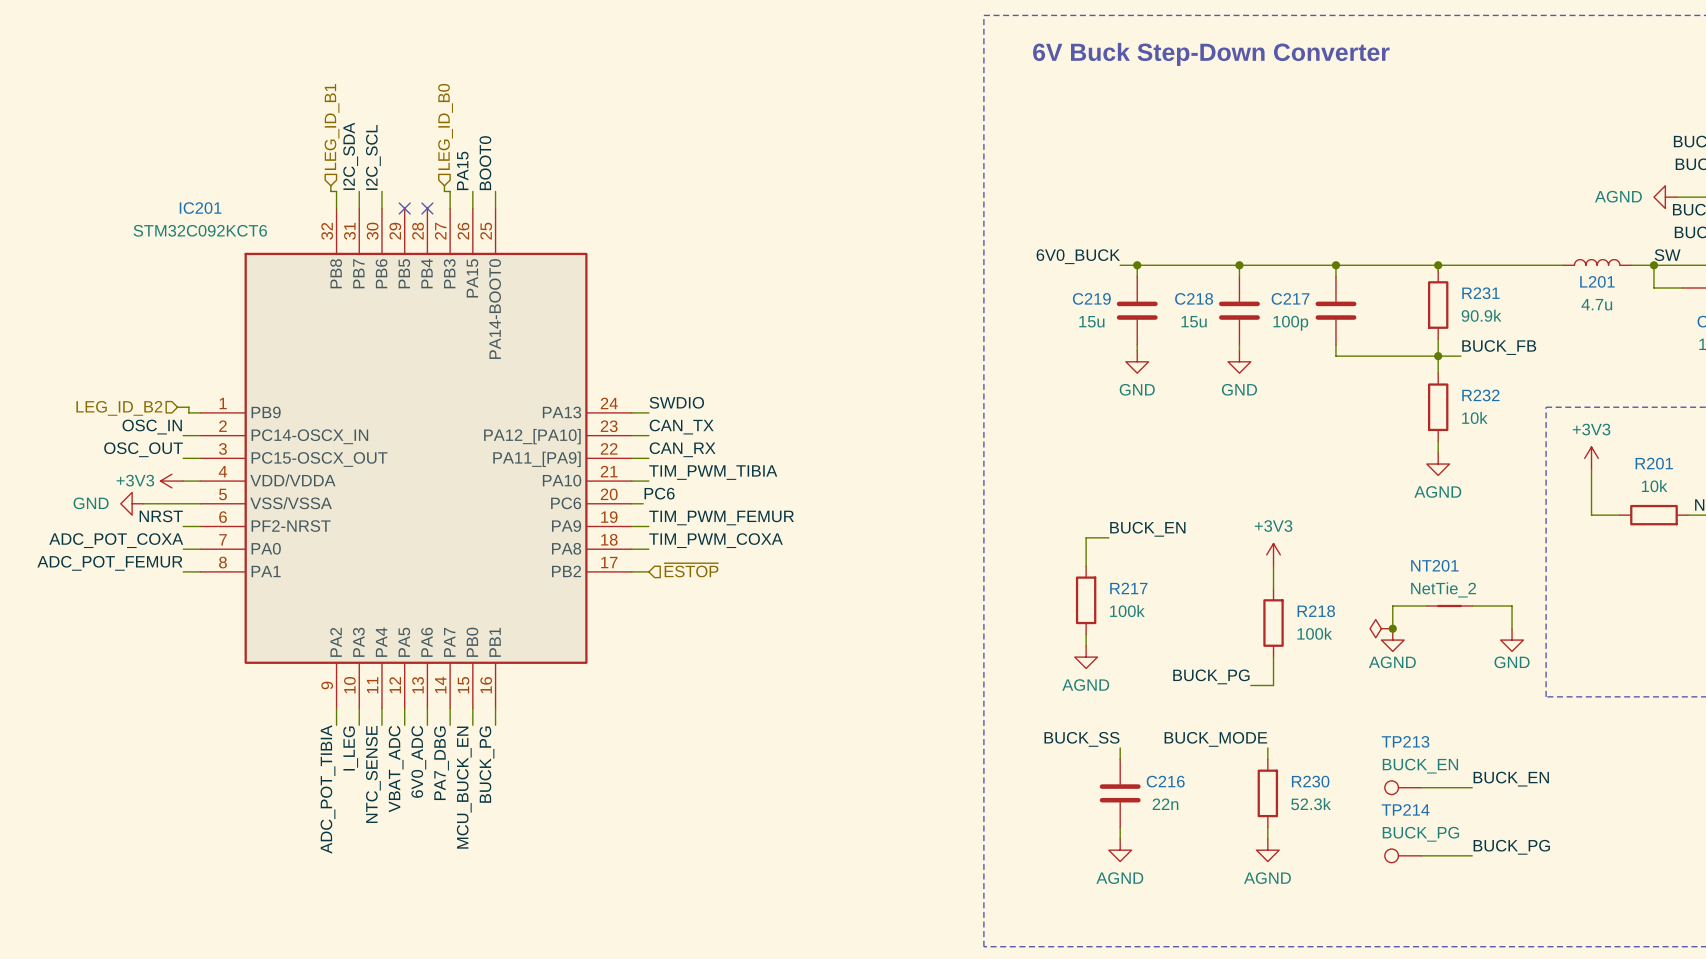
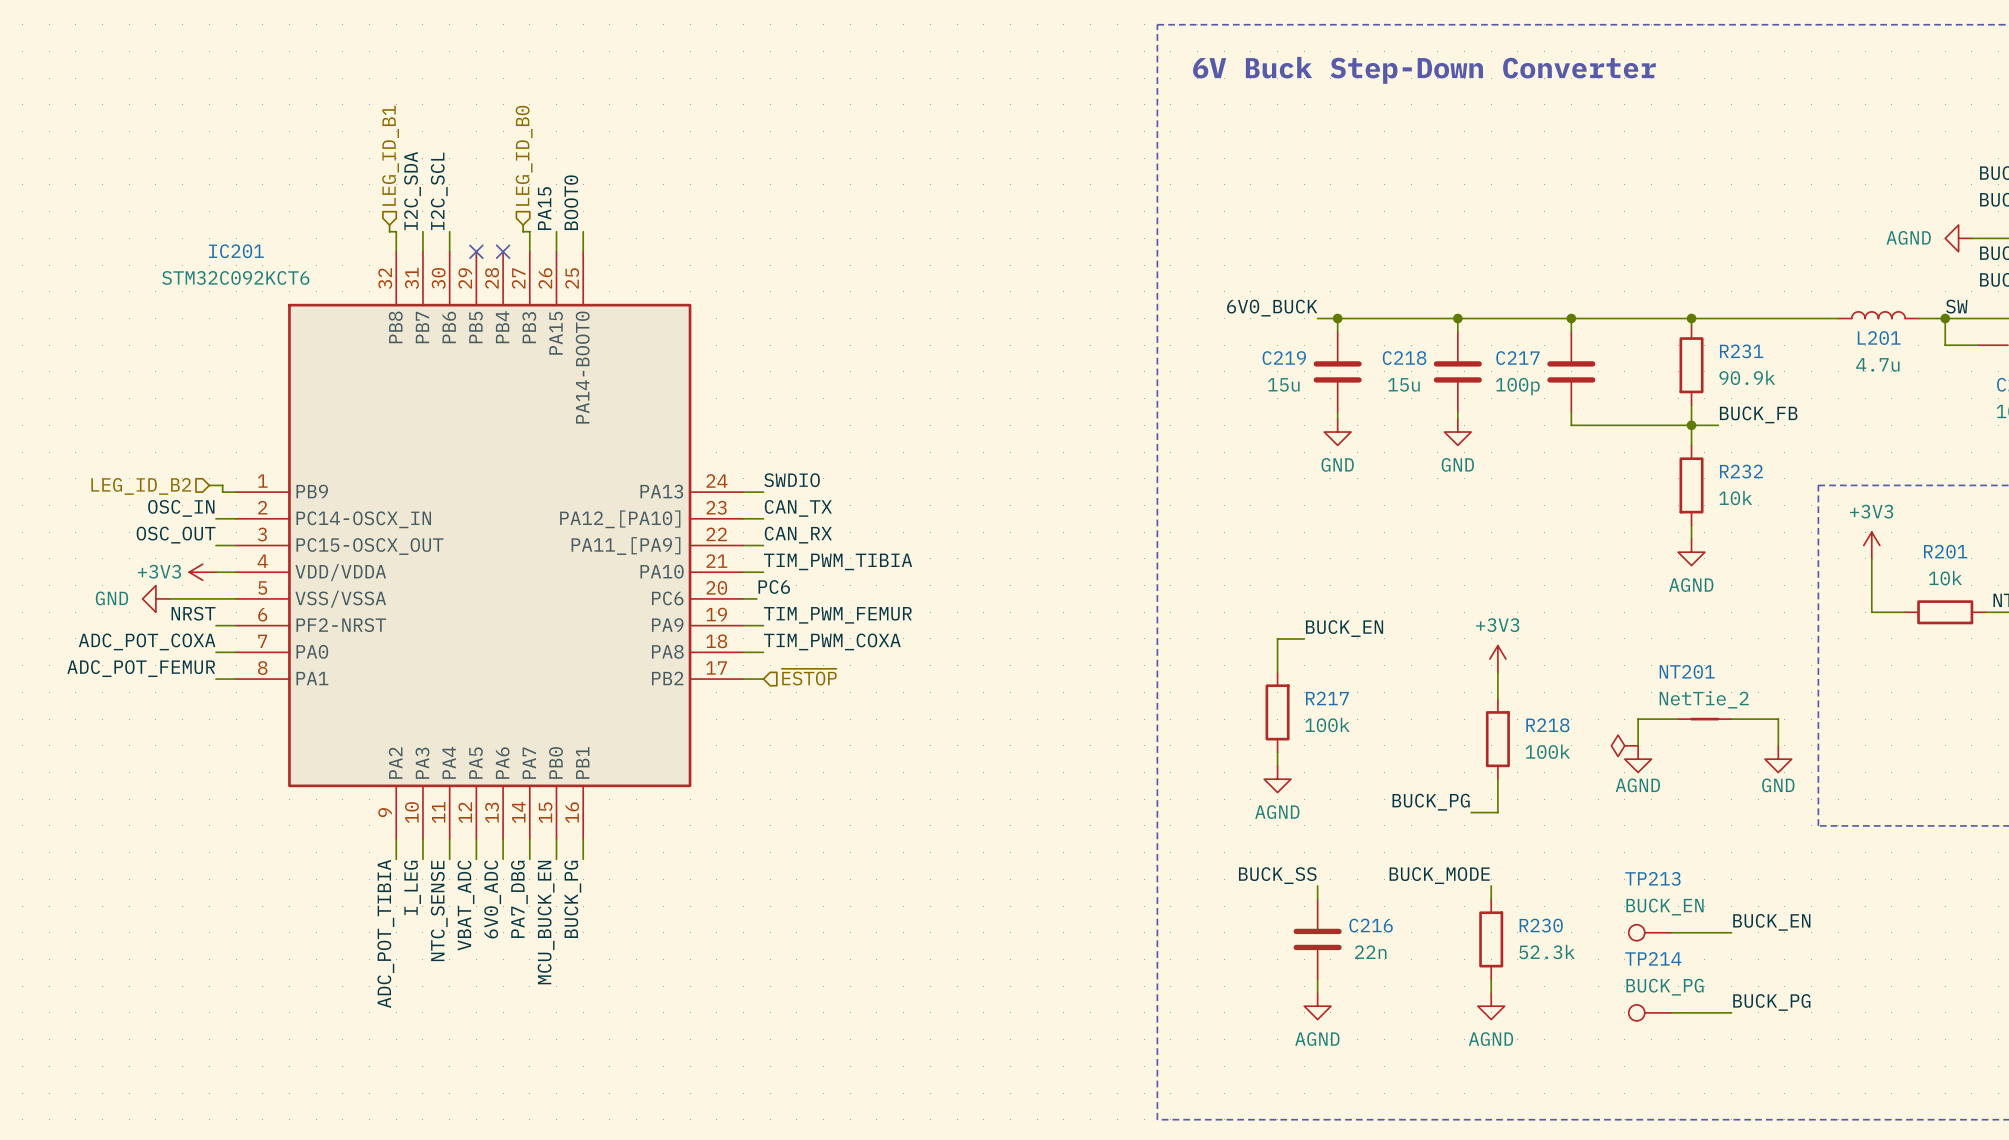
junction: (1392, 628) -> none

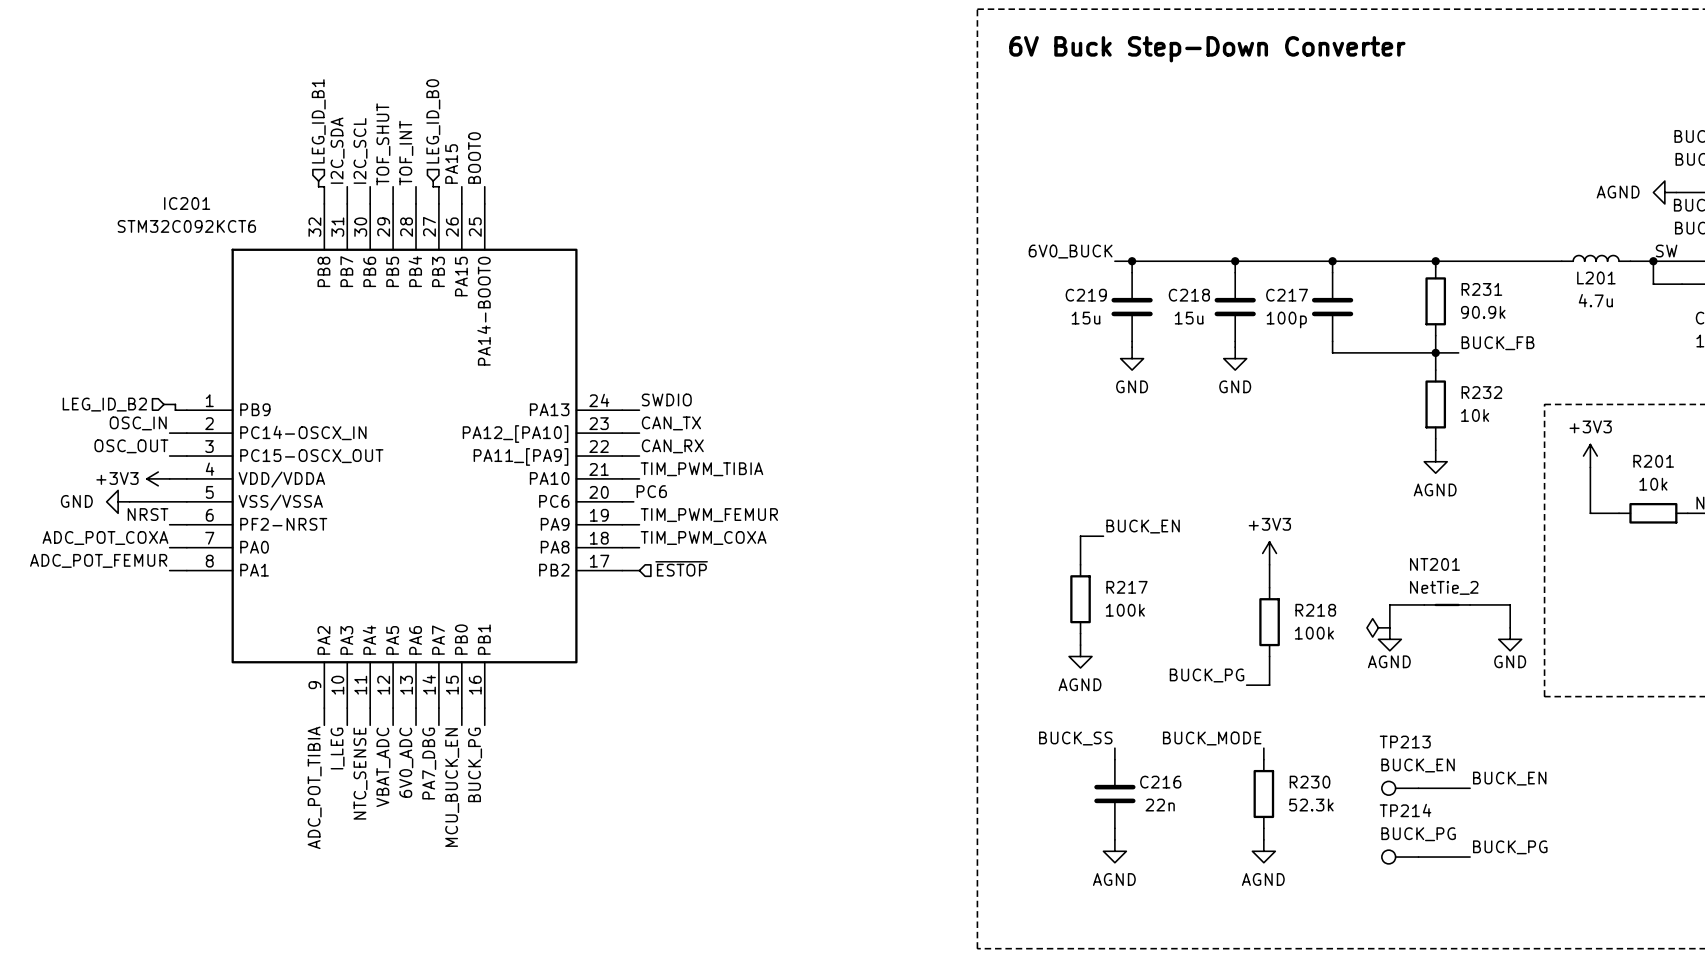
label: none -> TOF_SHUT (383, 144)
label: none -> TOF_INT (406, 153)
wire: none -> (393, 186) (393, 203)
wire: none -> (416, 186) (416, 203)
no-connect mark: (476, 251) -> none
no-connect mark: (503, 251) -> none

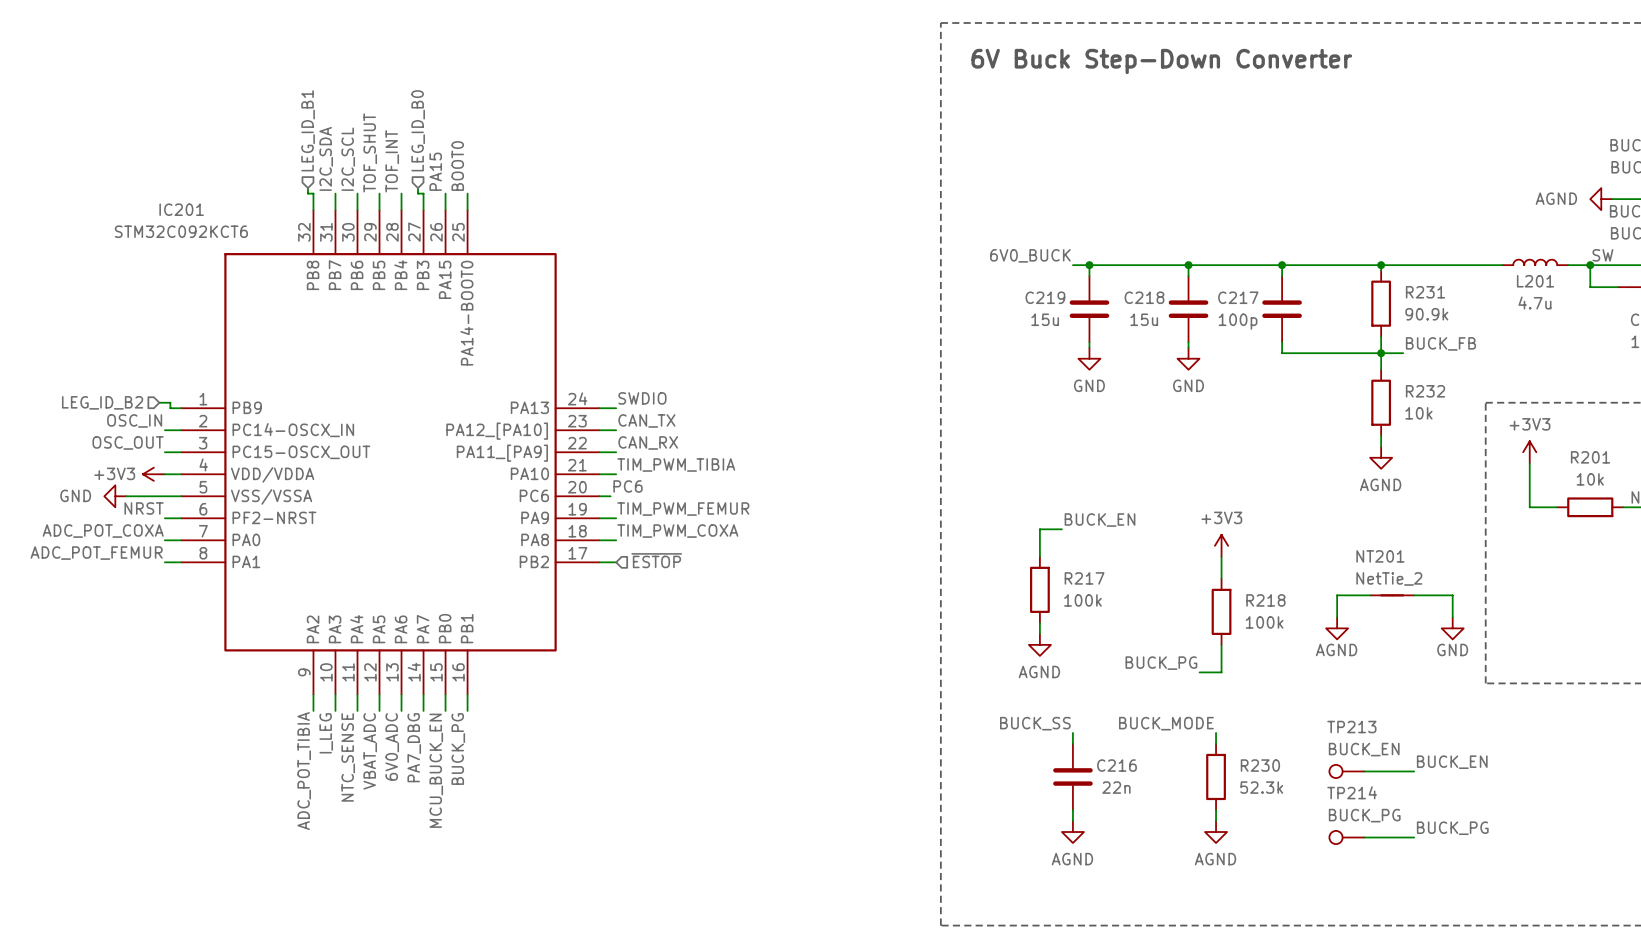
power symbol: (1378, 627) -> none

